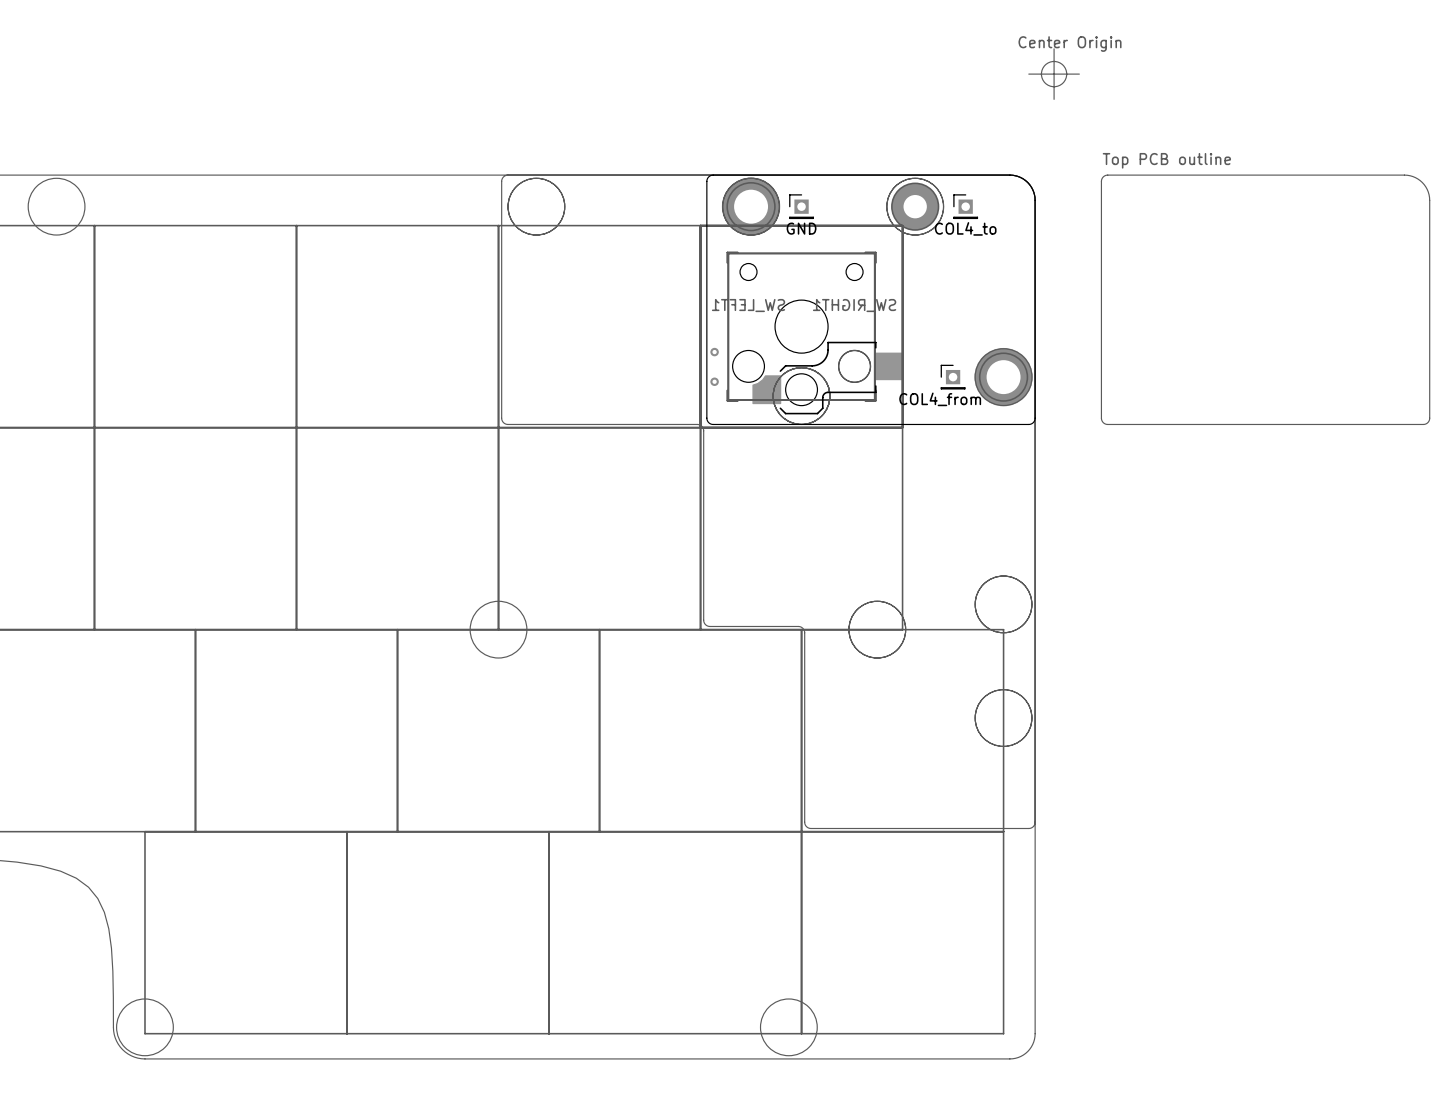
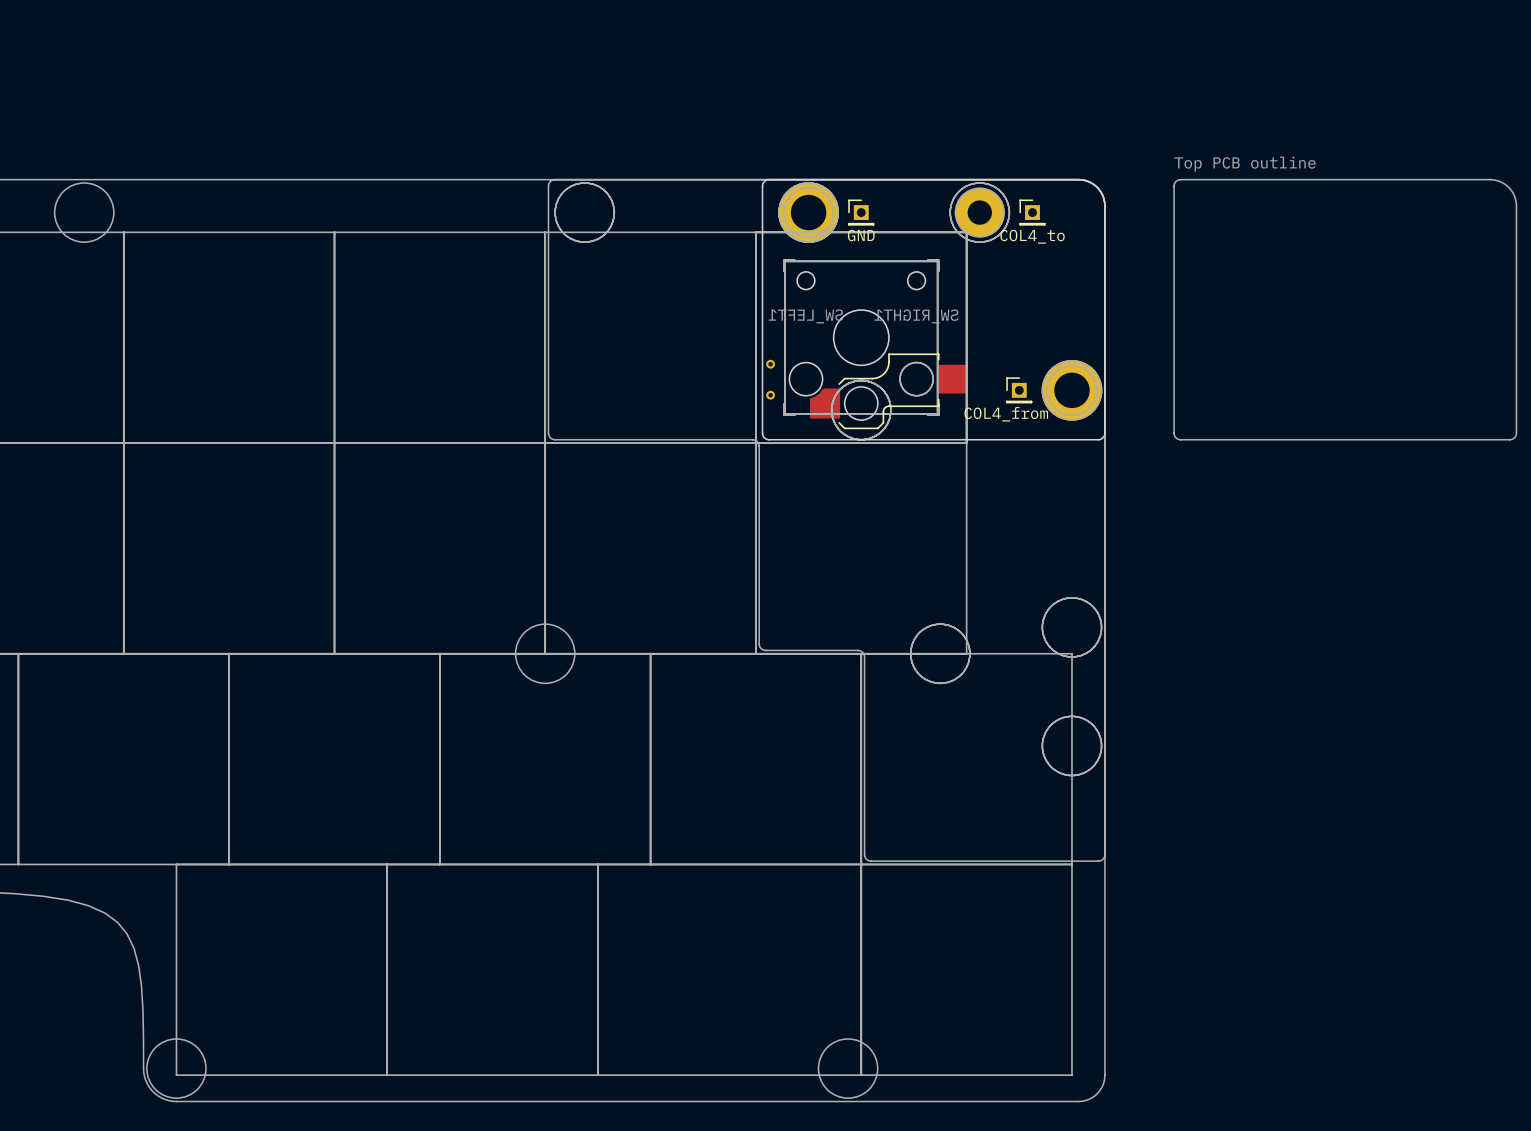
text: Center Origin (1070, 44) -> none
line: (1054, 48) (1054, 99) -> none
drawing: [1040, 60, 1068, 88] -> none
line: (1028, 74) (1079, 74) -> none

